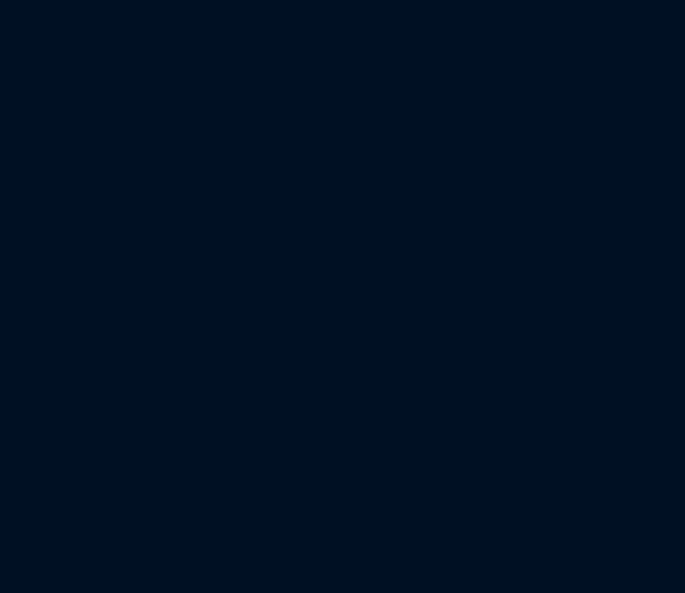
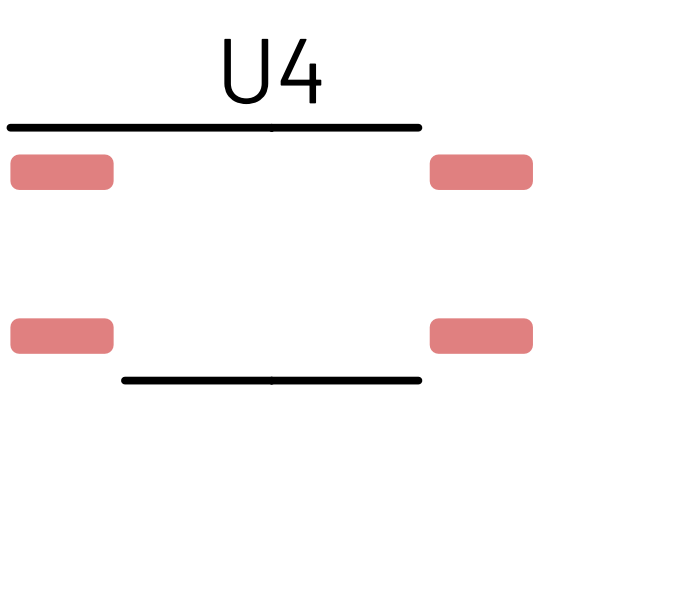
U4: none -> (269, 254)

